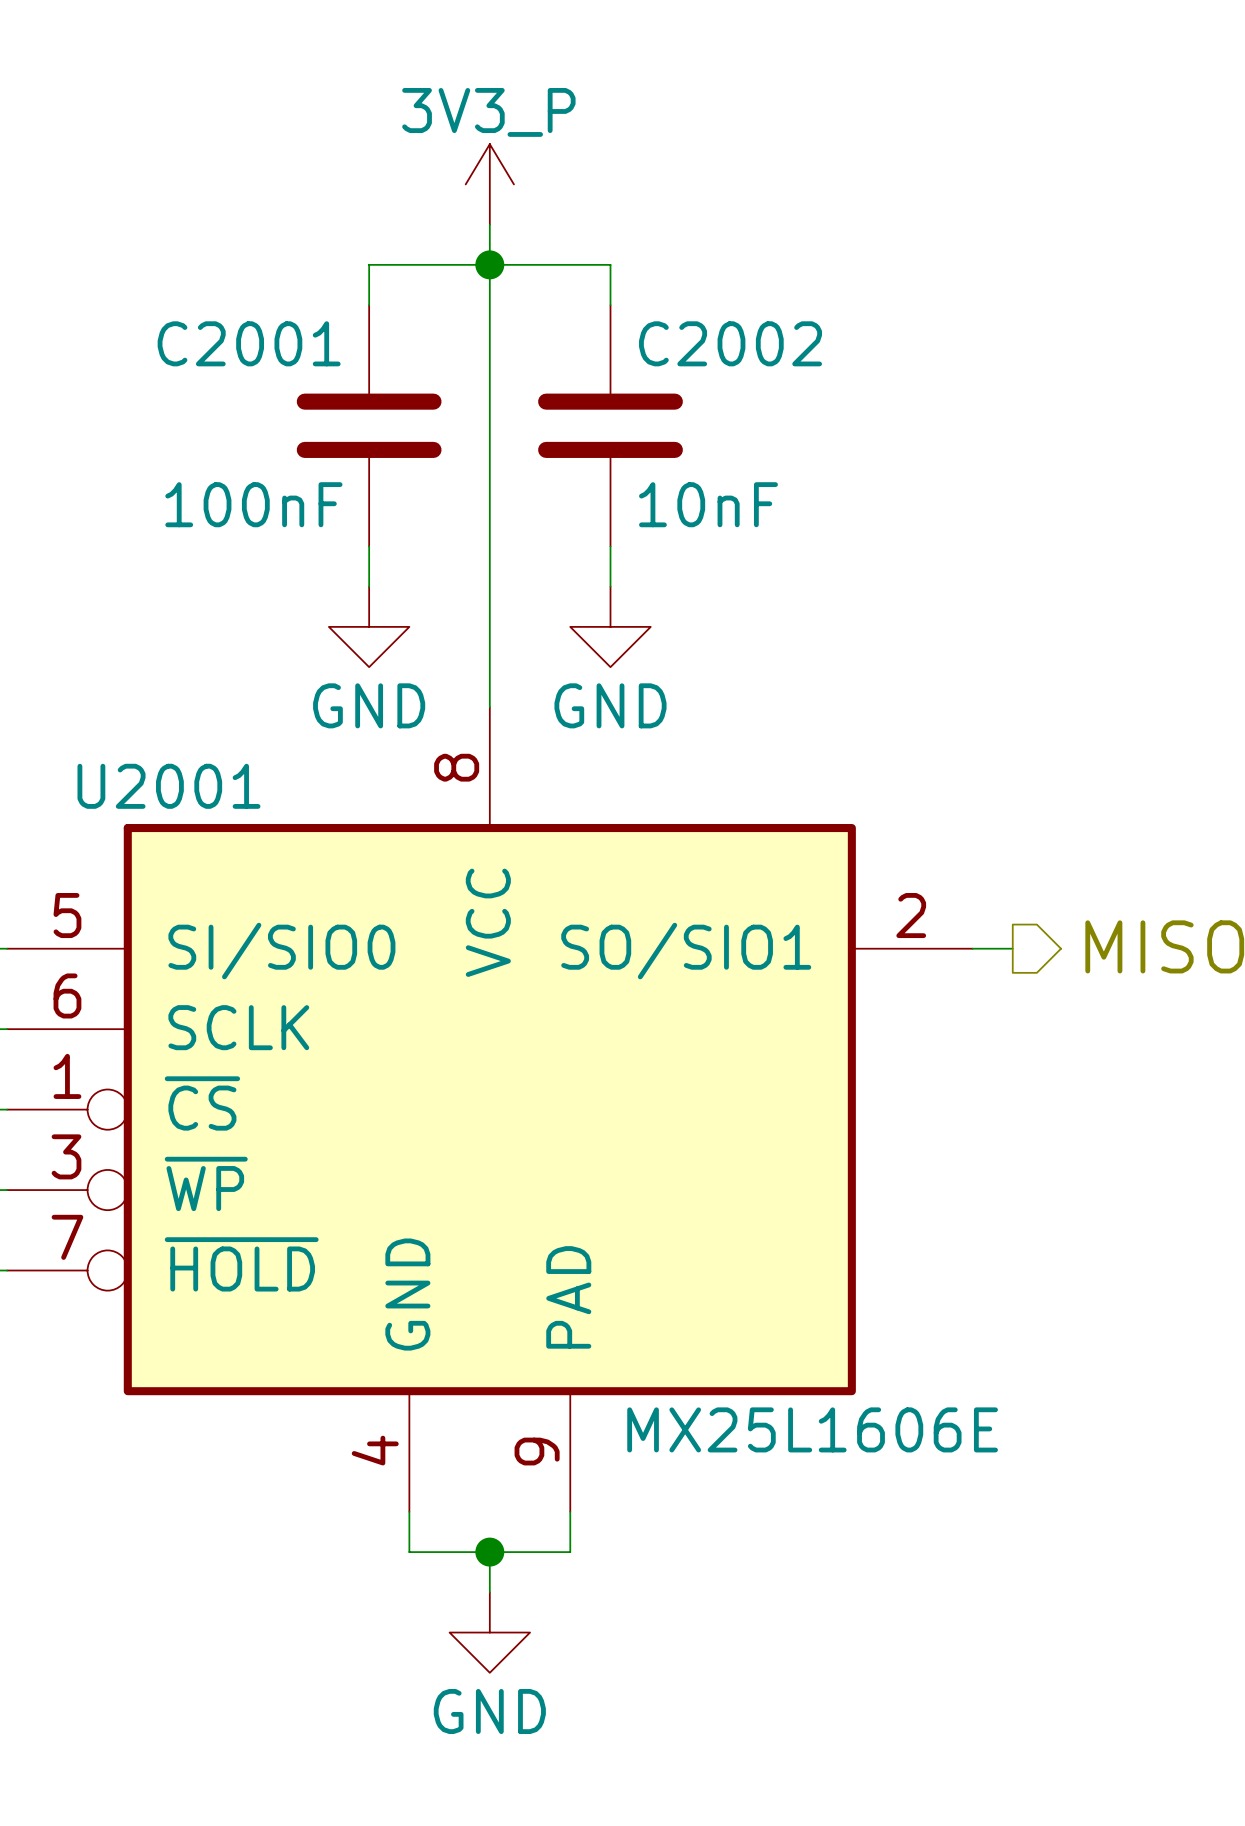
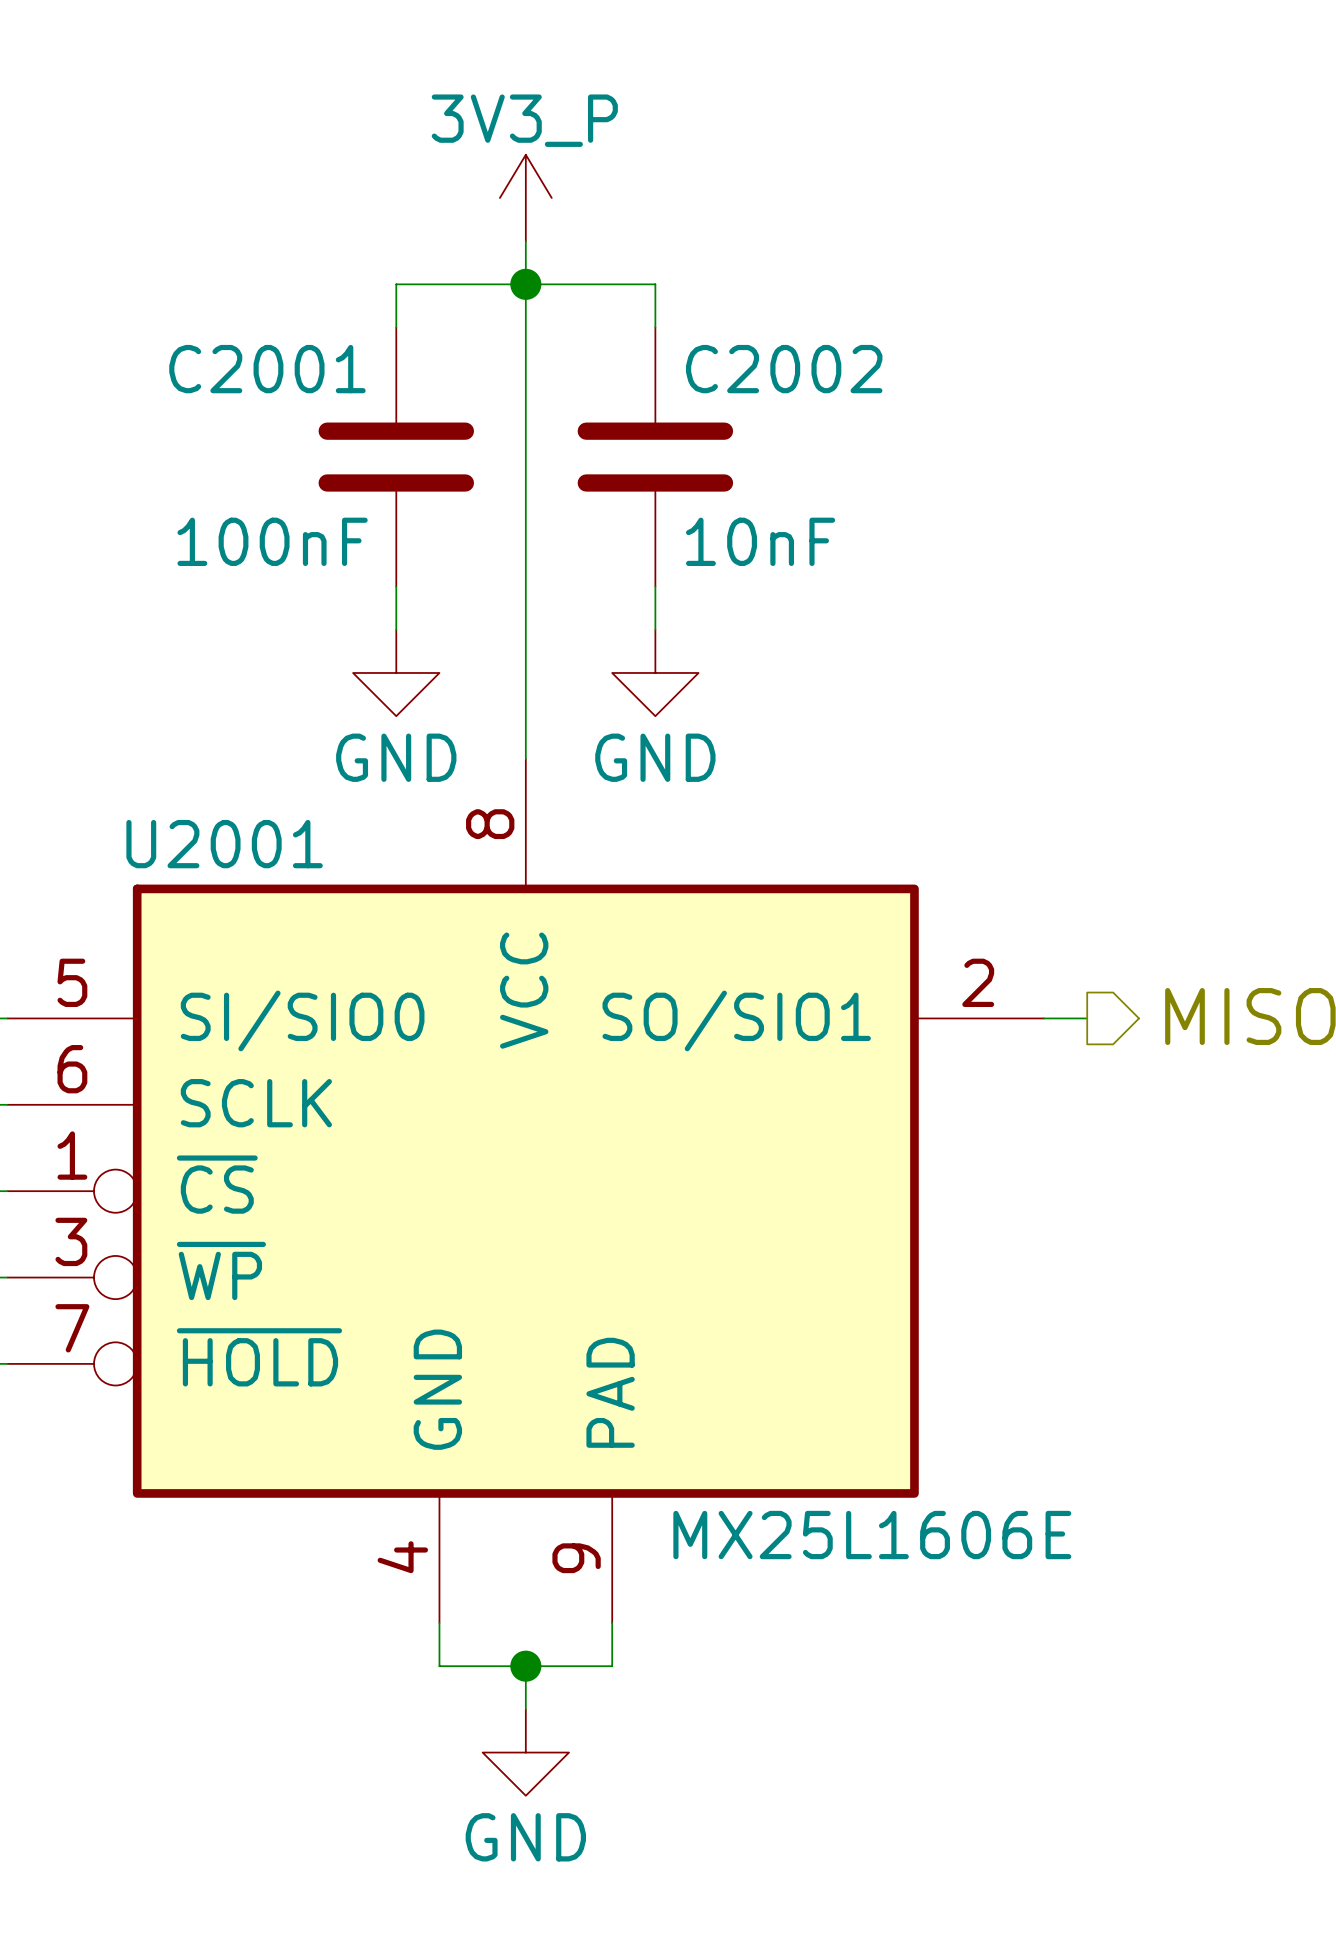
U2001 name position: U2001 (168, 786) -> U2001 (224, 844)

